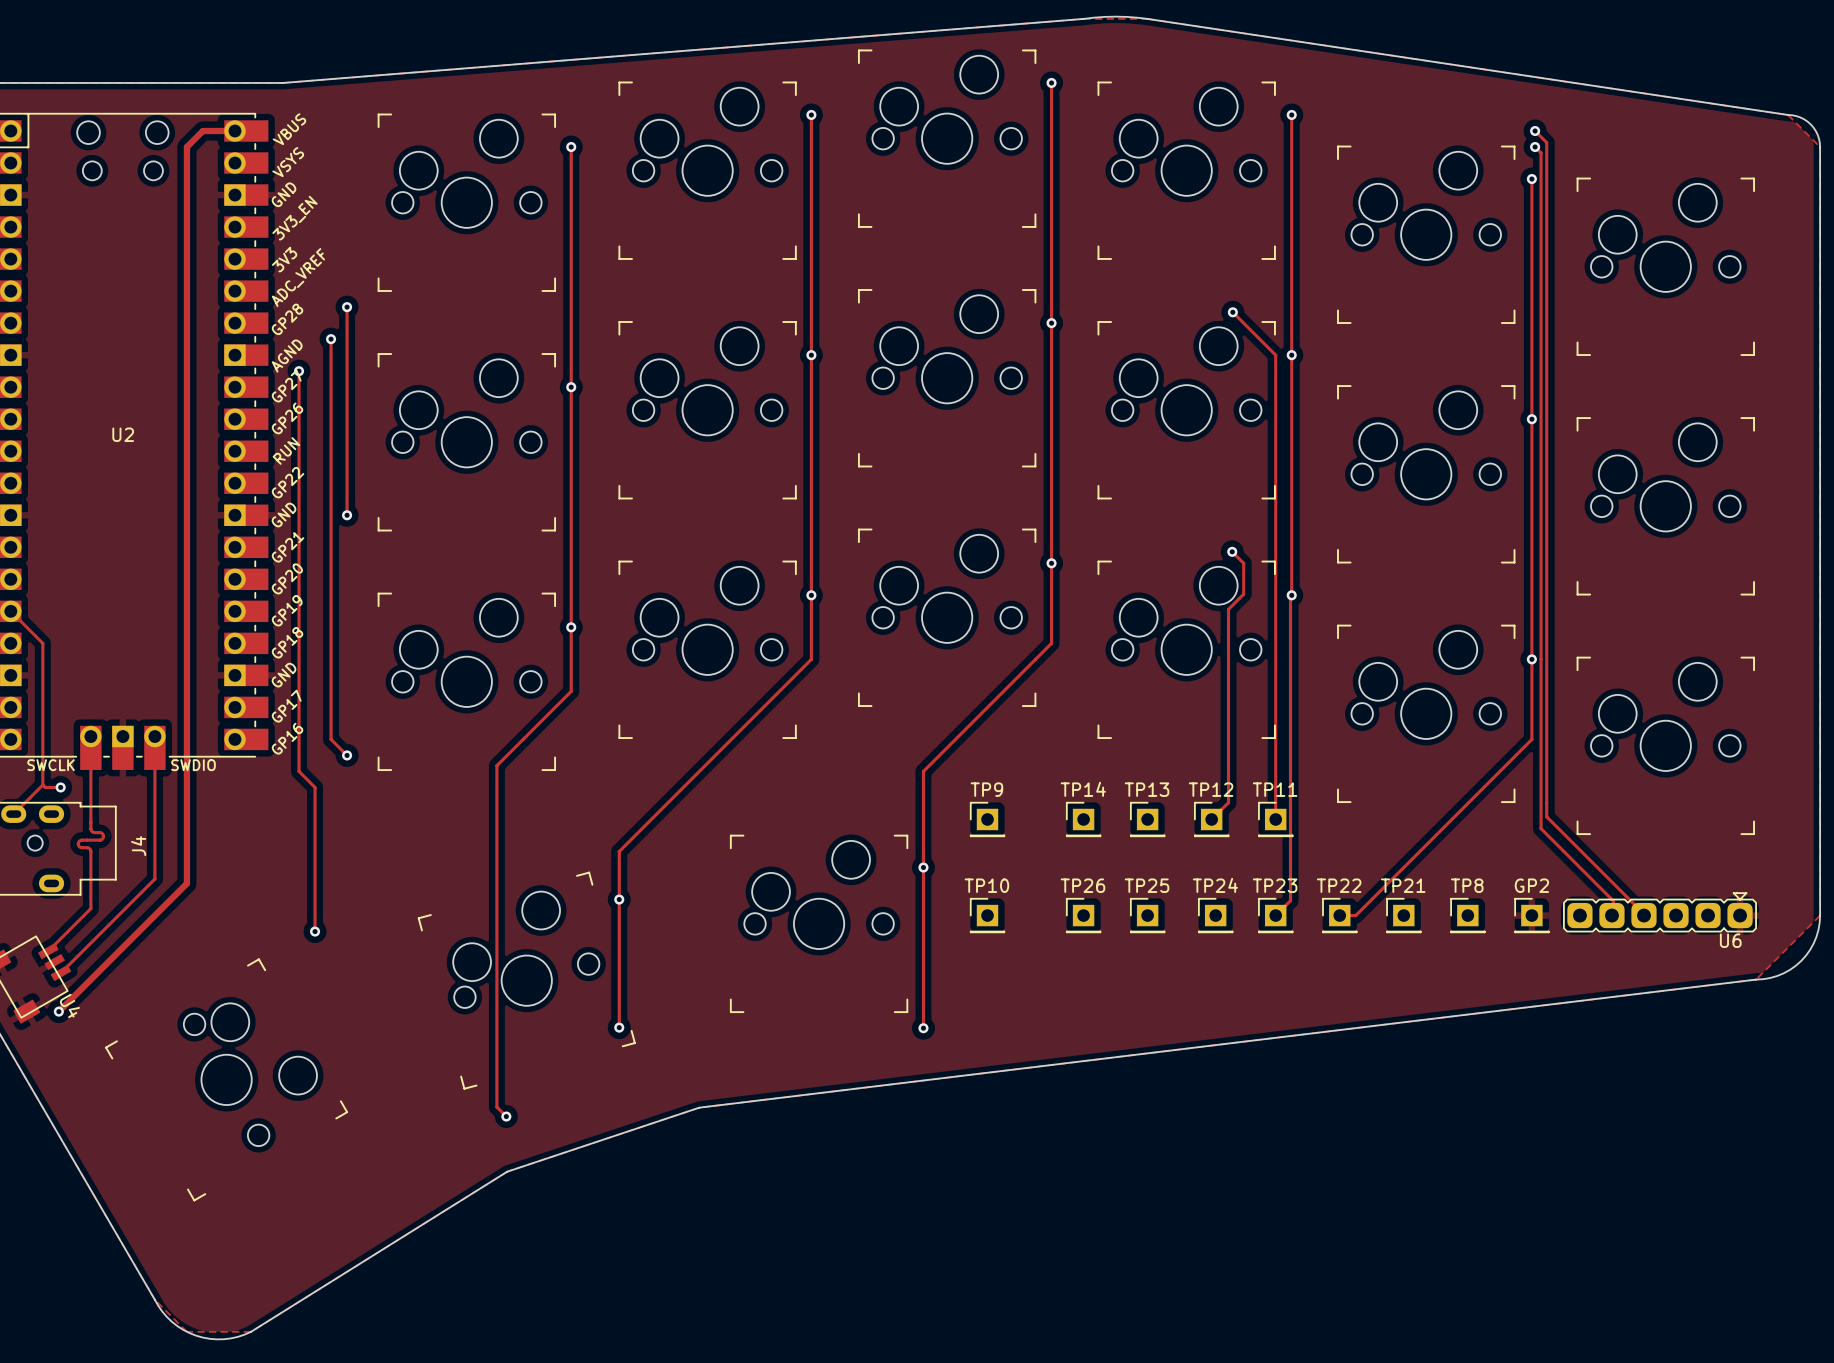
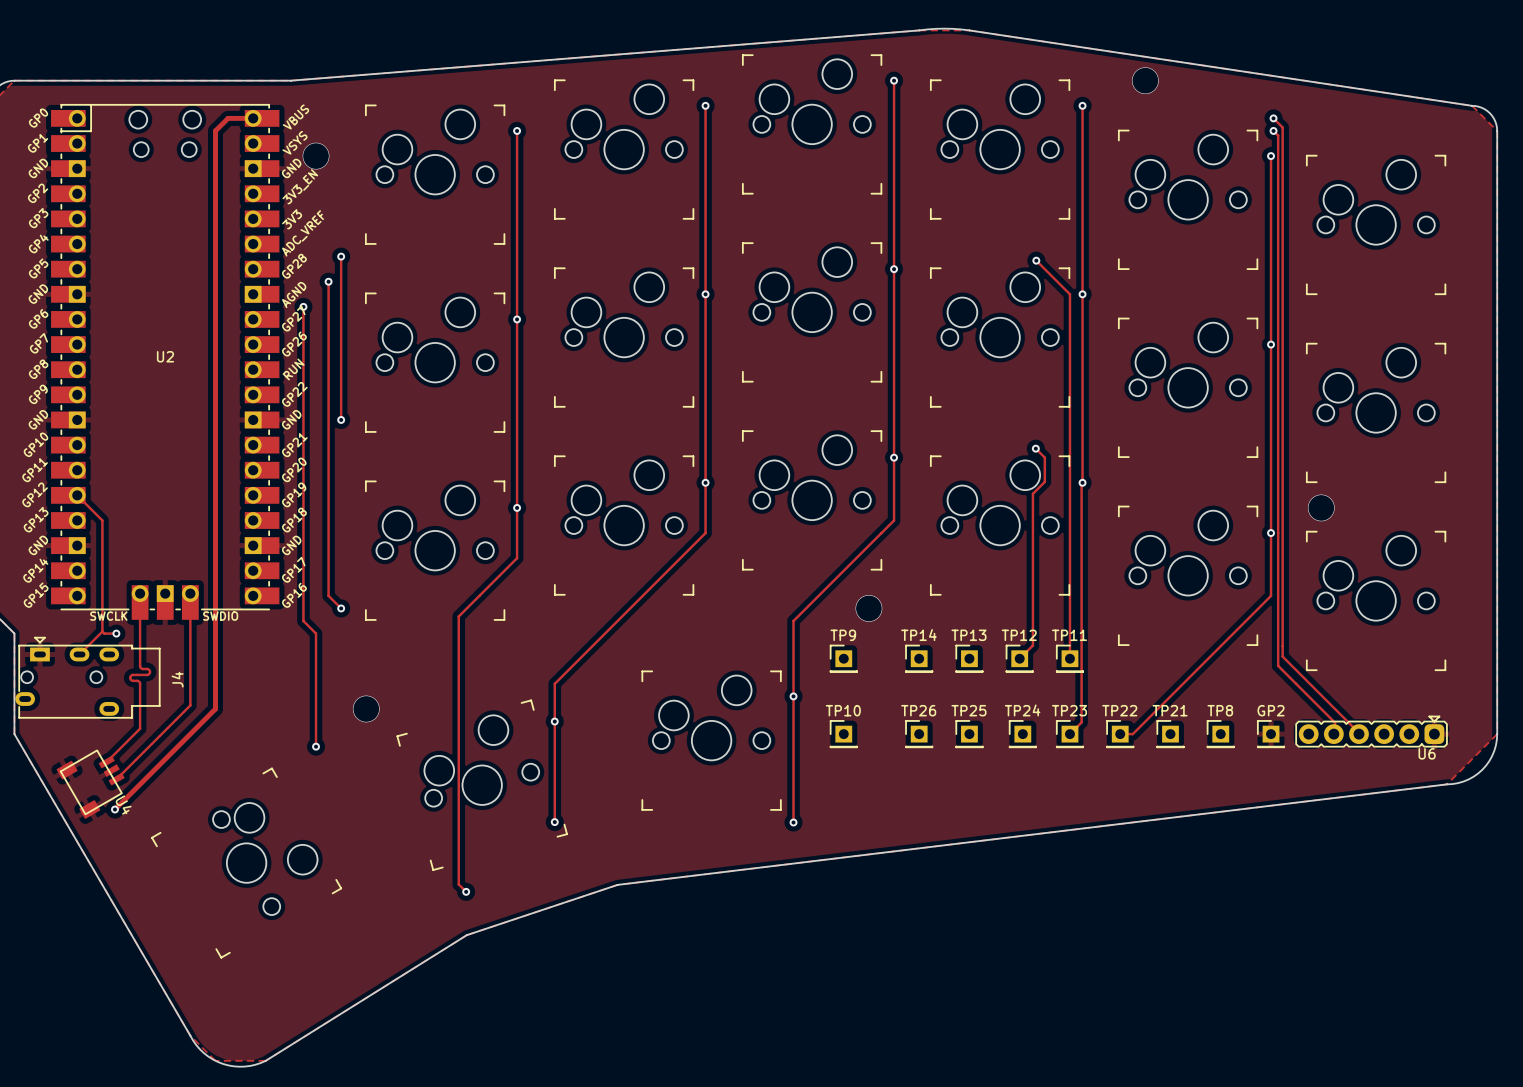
via: none -> (1145, 80)
via: none -> (316, 156)
via: none -> (1321, 507)
via: none -> (868, 608)
via: none -> (366, 708)
U6 footprint: [1563, 892, 1757, 933] -> [1295, 715, 1448, 748]

